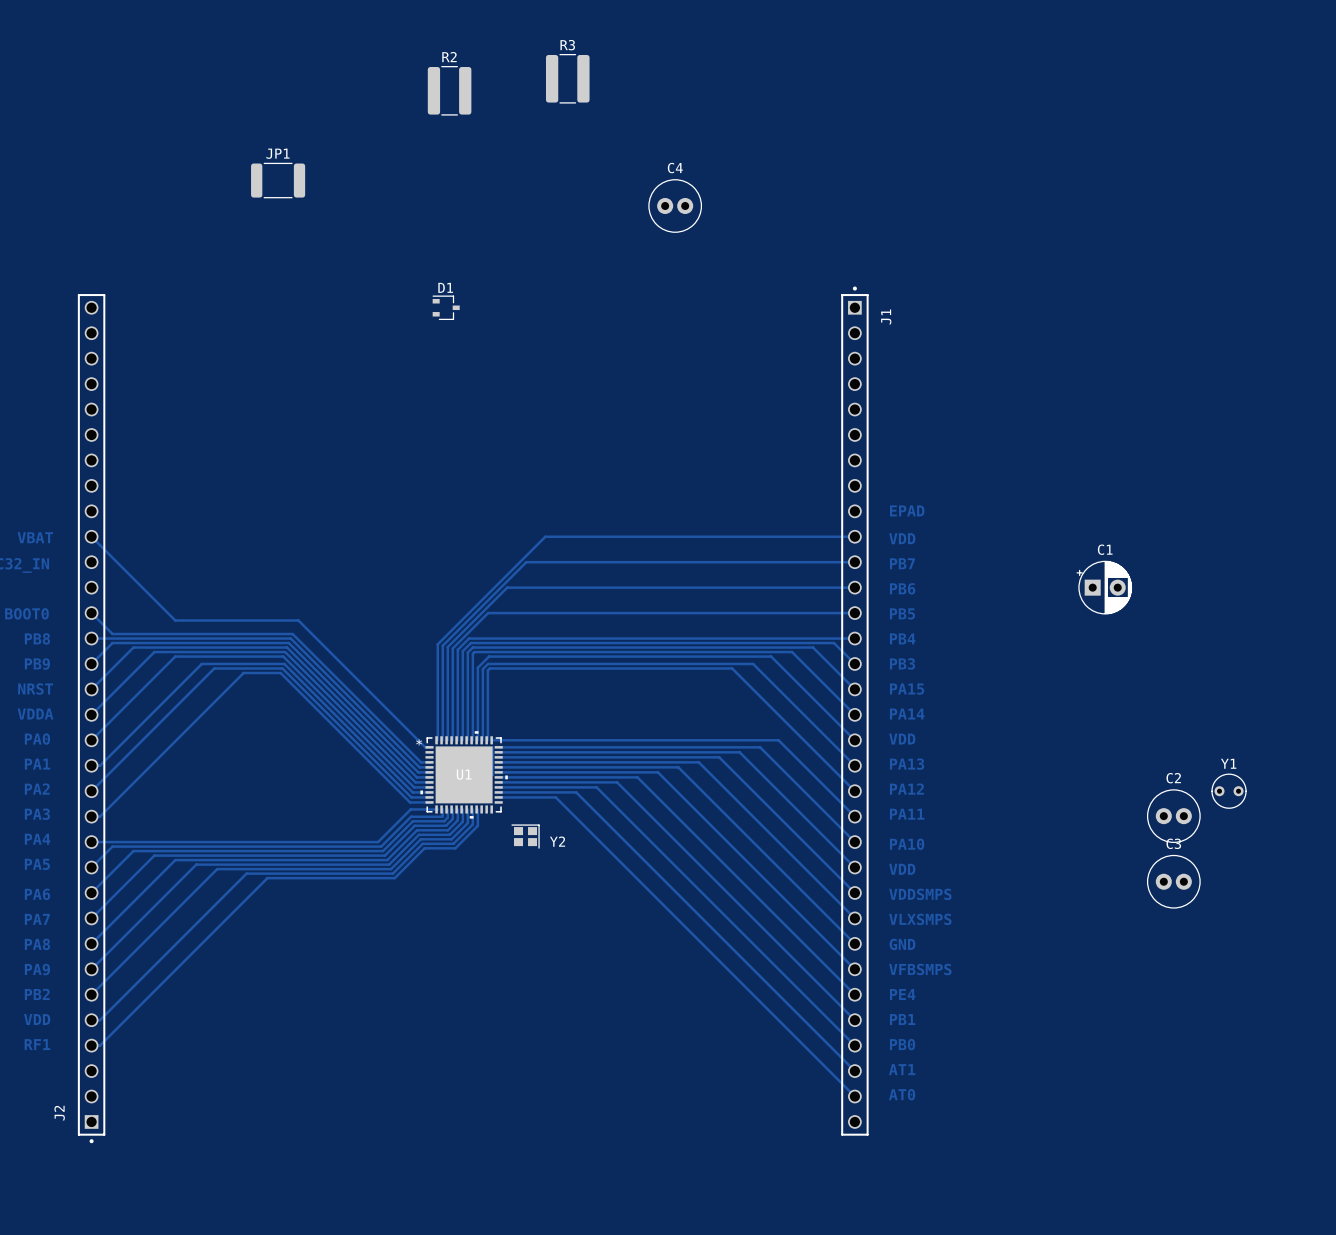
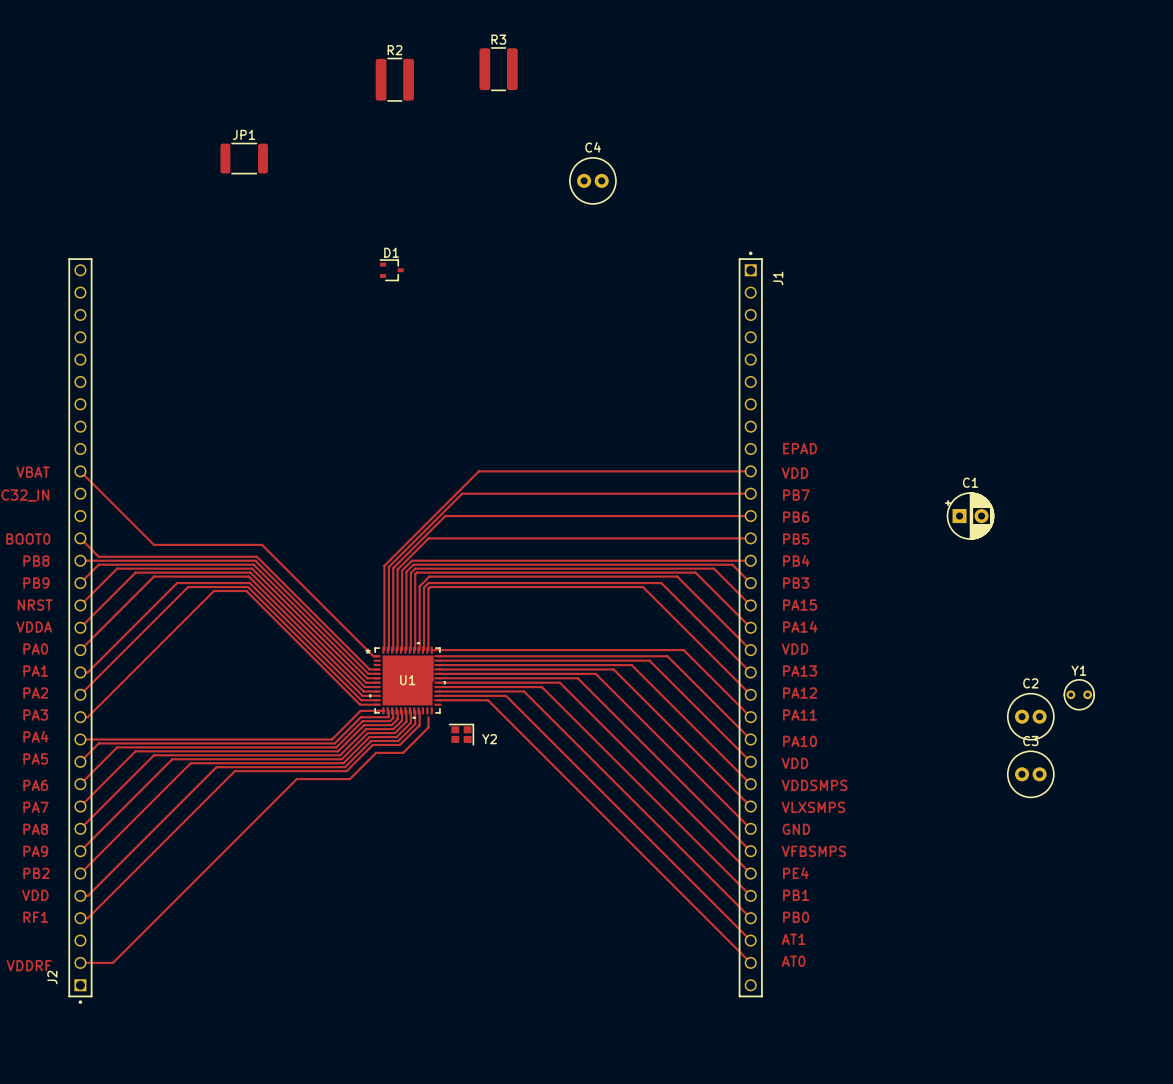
track: none -> (428, 717) (428, 727) (403, 752) (376, 752) (349, 779) (296, 779) (112, 962) (80, 962)
text: none -> VDDRF (29, 965)

